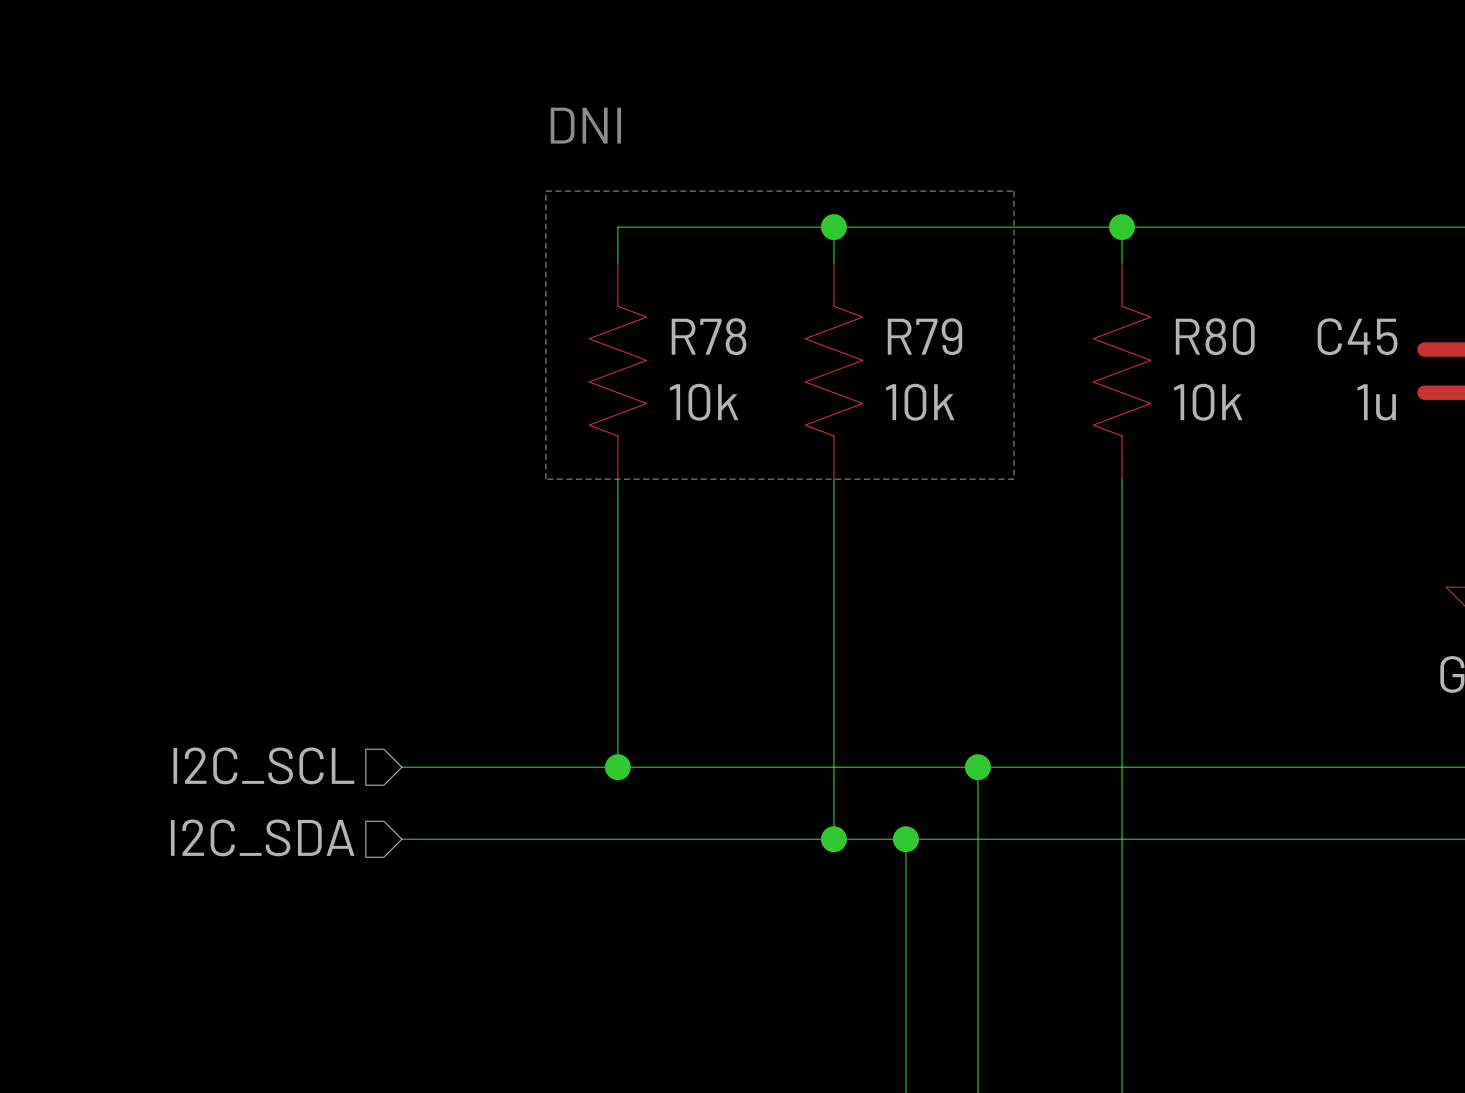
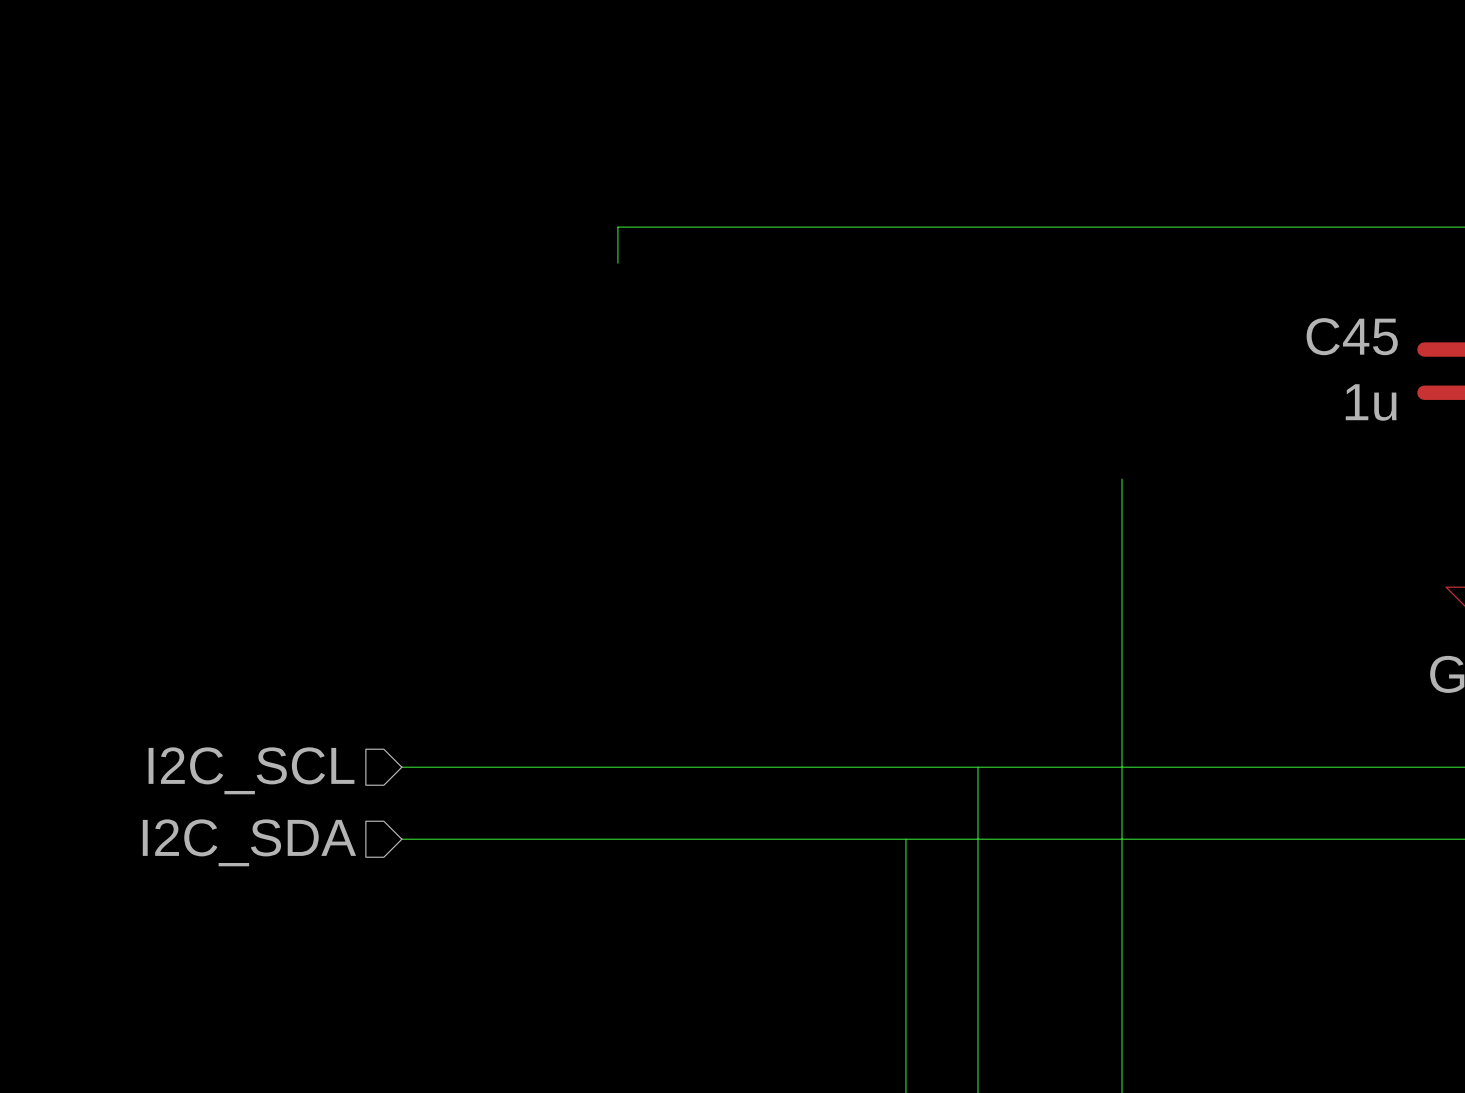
text: DNI (585, 125) -> none
line: (545, 191) (1013, 191) (1013, 479) (545, 479) (545, 191) -> none
wire: (833, 227) (833, 263) -> none
junction: (833, 227) -> none
wire: (1122, 227) (1122, 263) -> none
junction: (1122, 227) -> none
R78: 10k (617, 371) -> none
R79: 10k (833, 371) -> none
R80: 10k (1122, 371) -> none
wire: (617, 479) (617, 767) -> none
wire: (833, 479) (833, 839) -> none
junction: (617, 767) -> none
junction: (977, 767) -> none
junction: (833, 839) -> none
junction: (905, 839) -> none

